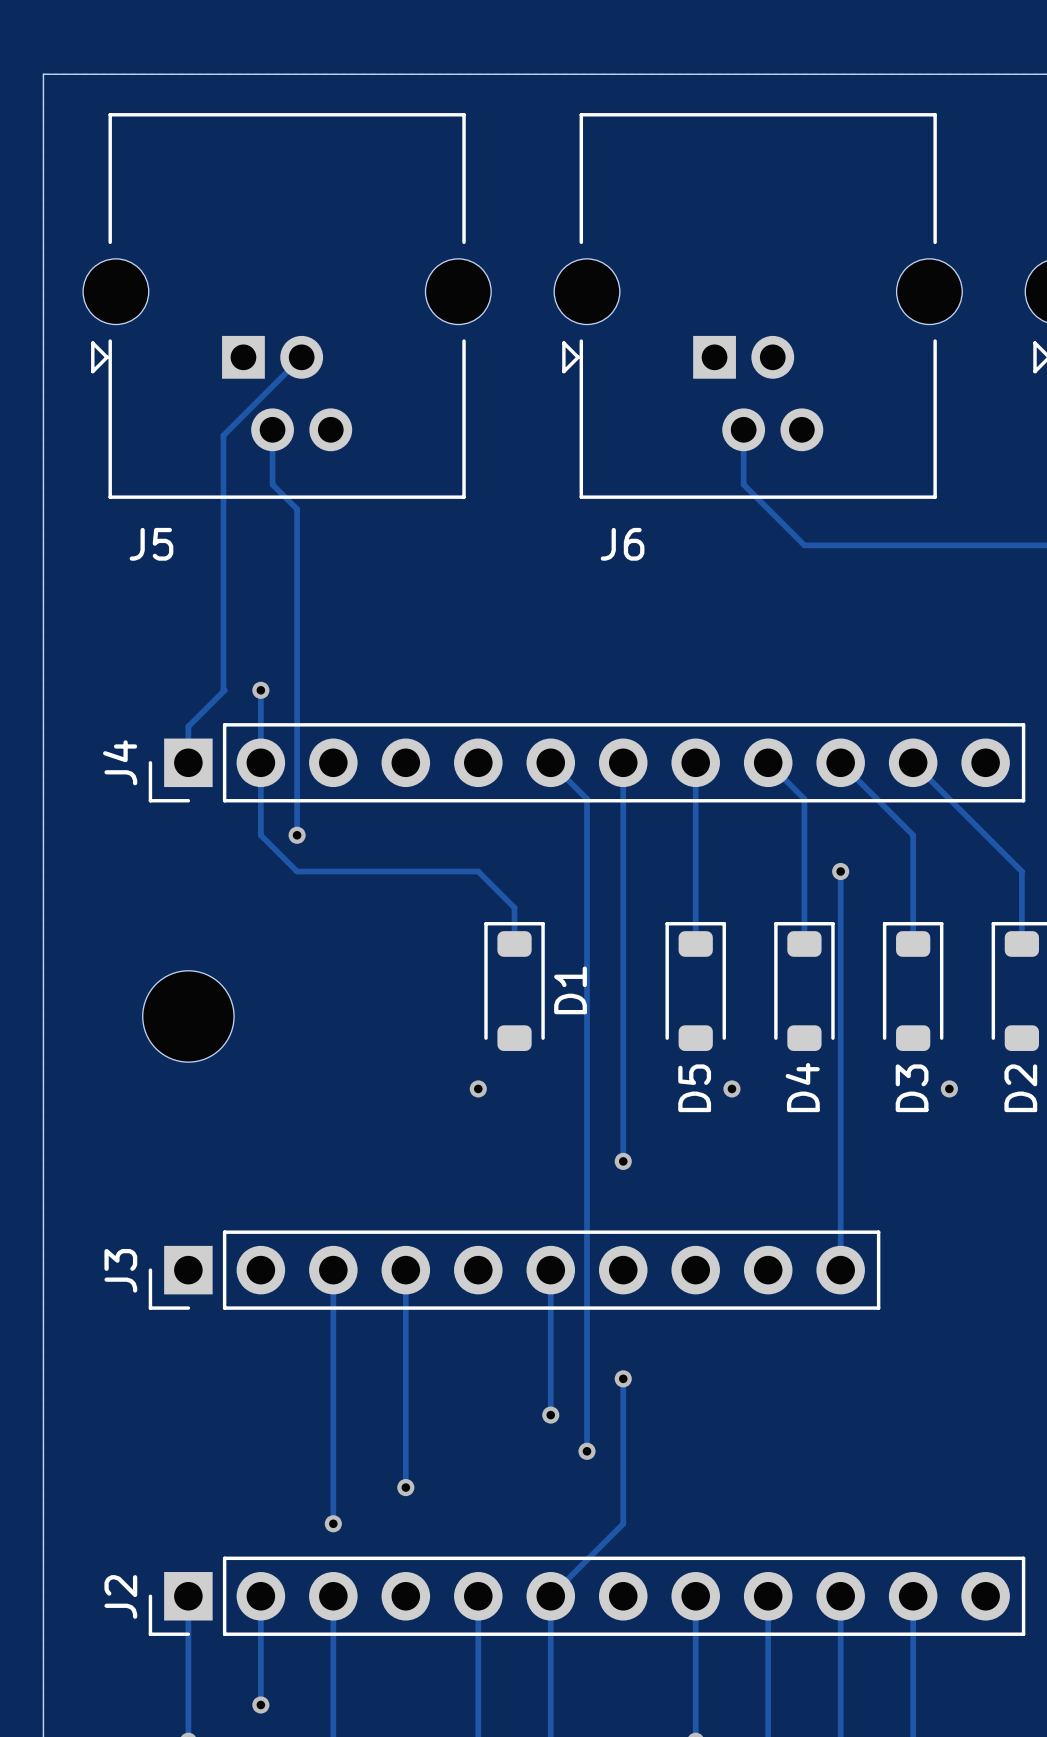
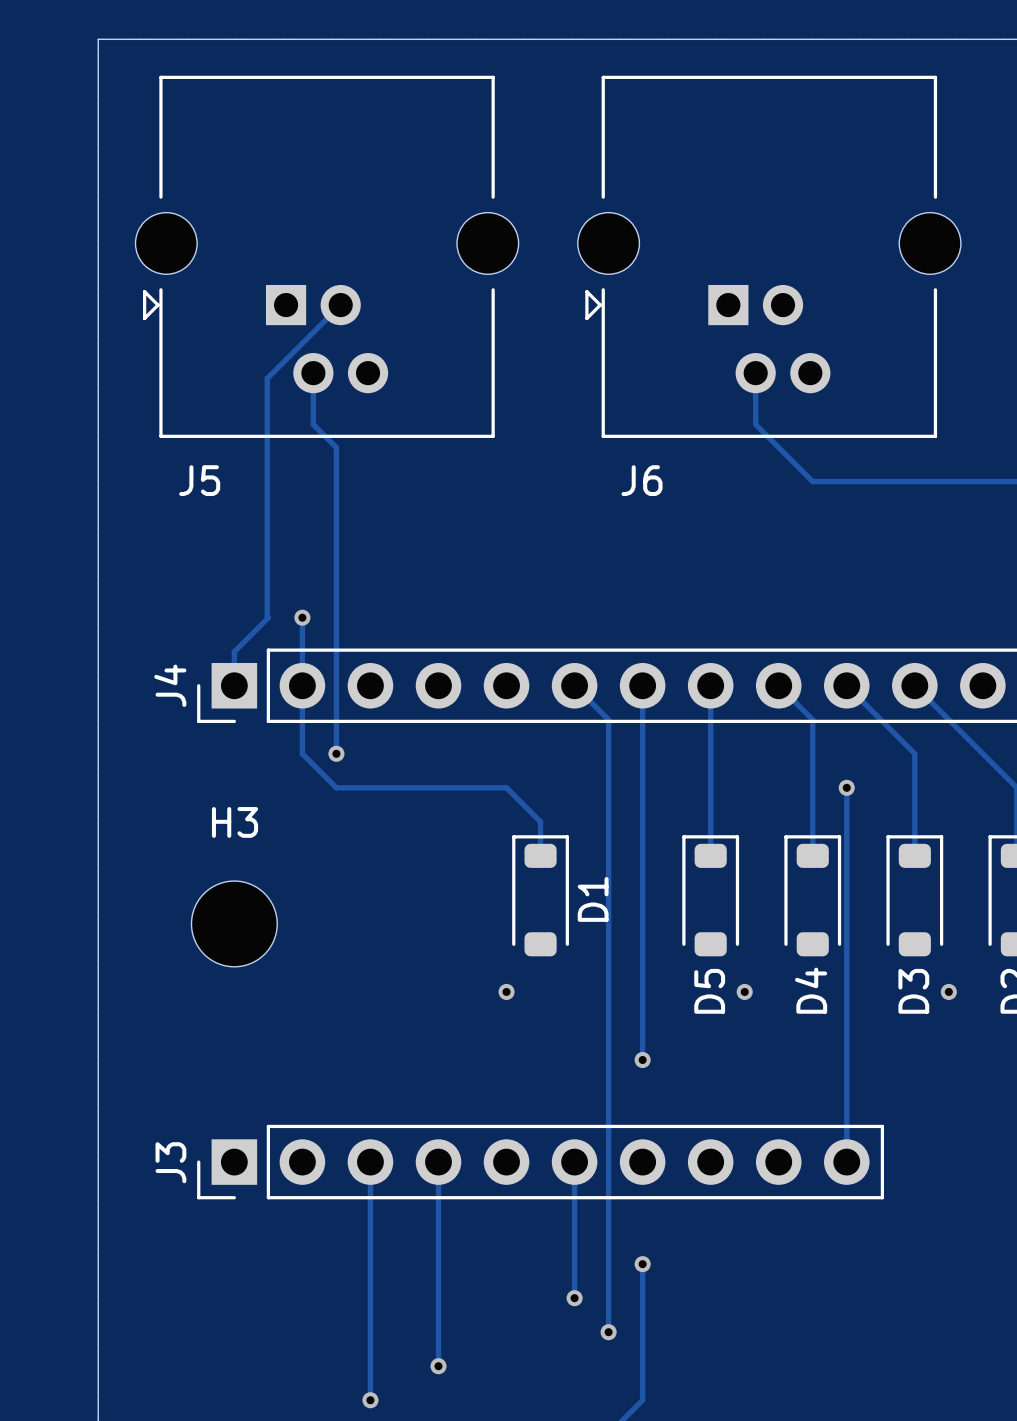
H3 name: none -> H3 (235, 822)

